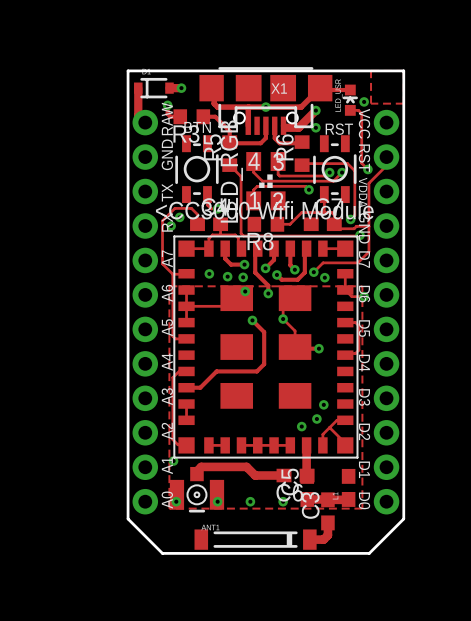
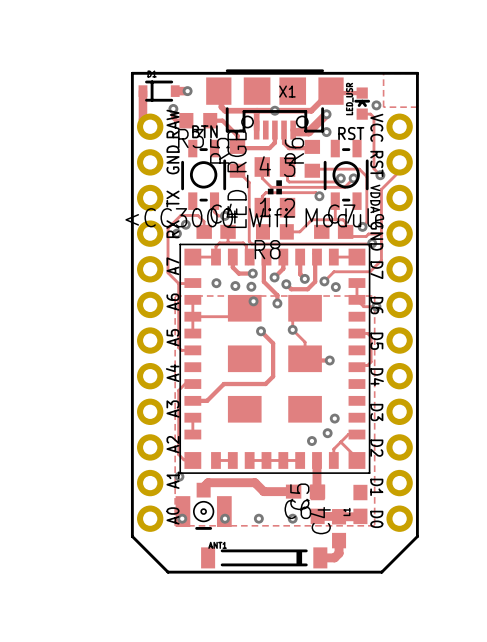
C3 name: C3 (310, 505) -> C4 (320, 520)

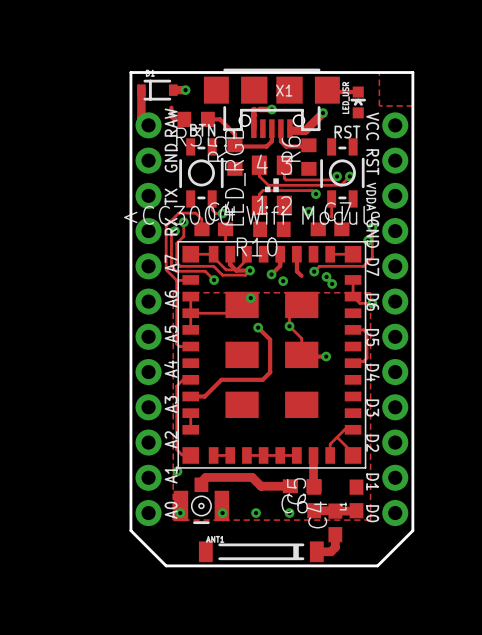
track: (218, 91) (221, 93) (221, 107) (225, 110) (262, 110) -> none
track: (331, 91) (311, 110) (274, 110) -> none
via: (376, 105) -> none
via: (173, 108) -> none
track: (362, 114) (370, 114) (373, 117) (373, 168) (380, 175) -> none
via: (326, 132) -> none
track: (399, 162) (399, 171) (381, 189) (381, 260) (370, 271) (334, 271) (324, 281) -> none
track: (237, 170) (249, 182) (249, 241) (251, 243) (372, 243) -> none
track: (312, 170) (313, 169) (359, 169) (366, 176) (366, 222) (362, 226) -> none
via: (380, 175) -> none
via: none -> (308, 211)
track: none -> (183, 222) (183, 236) (176, 243) (176, 262) (180, 266) (213, 266) (222, 275) (245, 275) (247, 273)
via position: (362, 226) -> (372, 227)
track: none -> (372, 227) (372, 257) (363, 266) (319, 266) (314, 271)
track: (345, 231) (345, 222) (342, 219) (311, 219) (299, 231) (286, 231) -> none
track: (345, 231) (350, 236) (381, 234) -> none
track: none -> (174, 231) (171, 234) (171, 266) (176, 271) (205, 271) (212, 278)
R8 name: R8 (267, 249) -> R10 (257, 246)
track: (215, 251) (215, 246) (219, 242) (243, 242) (246, 246) (246, 253) (249, 257) -> none
track: none -> (213, 254) (213, 257) (226, 269) (236, 269) (245, 261)
track: (266, 257) (263, 259) (263, 281) (277, 295) (277, 303) -> none
track: (316, 258) (315, 258) (315, 281) (307, 289) (291, 289) (286, 284) -> none
via: none -> (314, 271)
via: (304, 278) -> none
via: none -> (326, 276)
via: (324, 281) -> none
via: (235, 286) -> none
via: (251, 286) -> none
via: (277, 303) -> none
via: (334, 418) -> none
via: (327, 433) -> none
via: (311, 441) -> none

